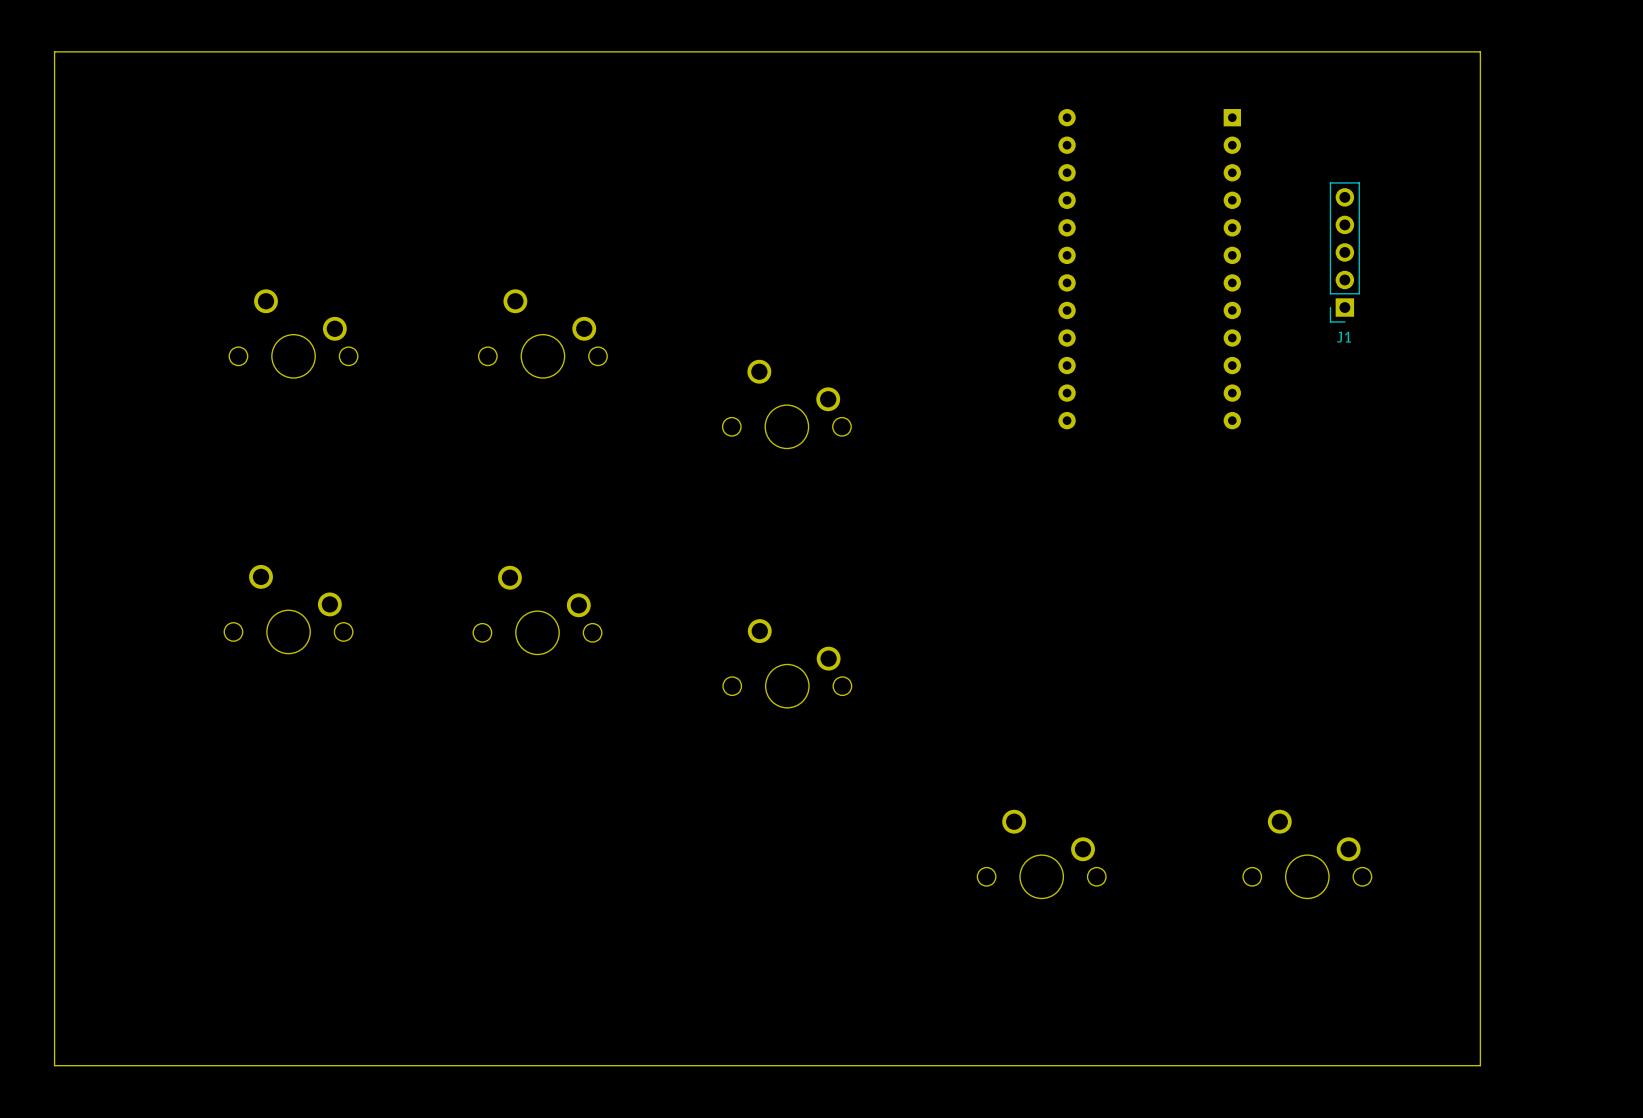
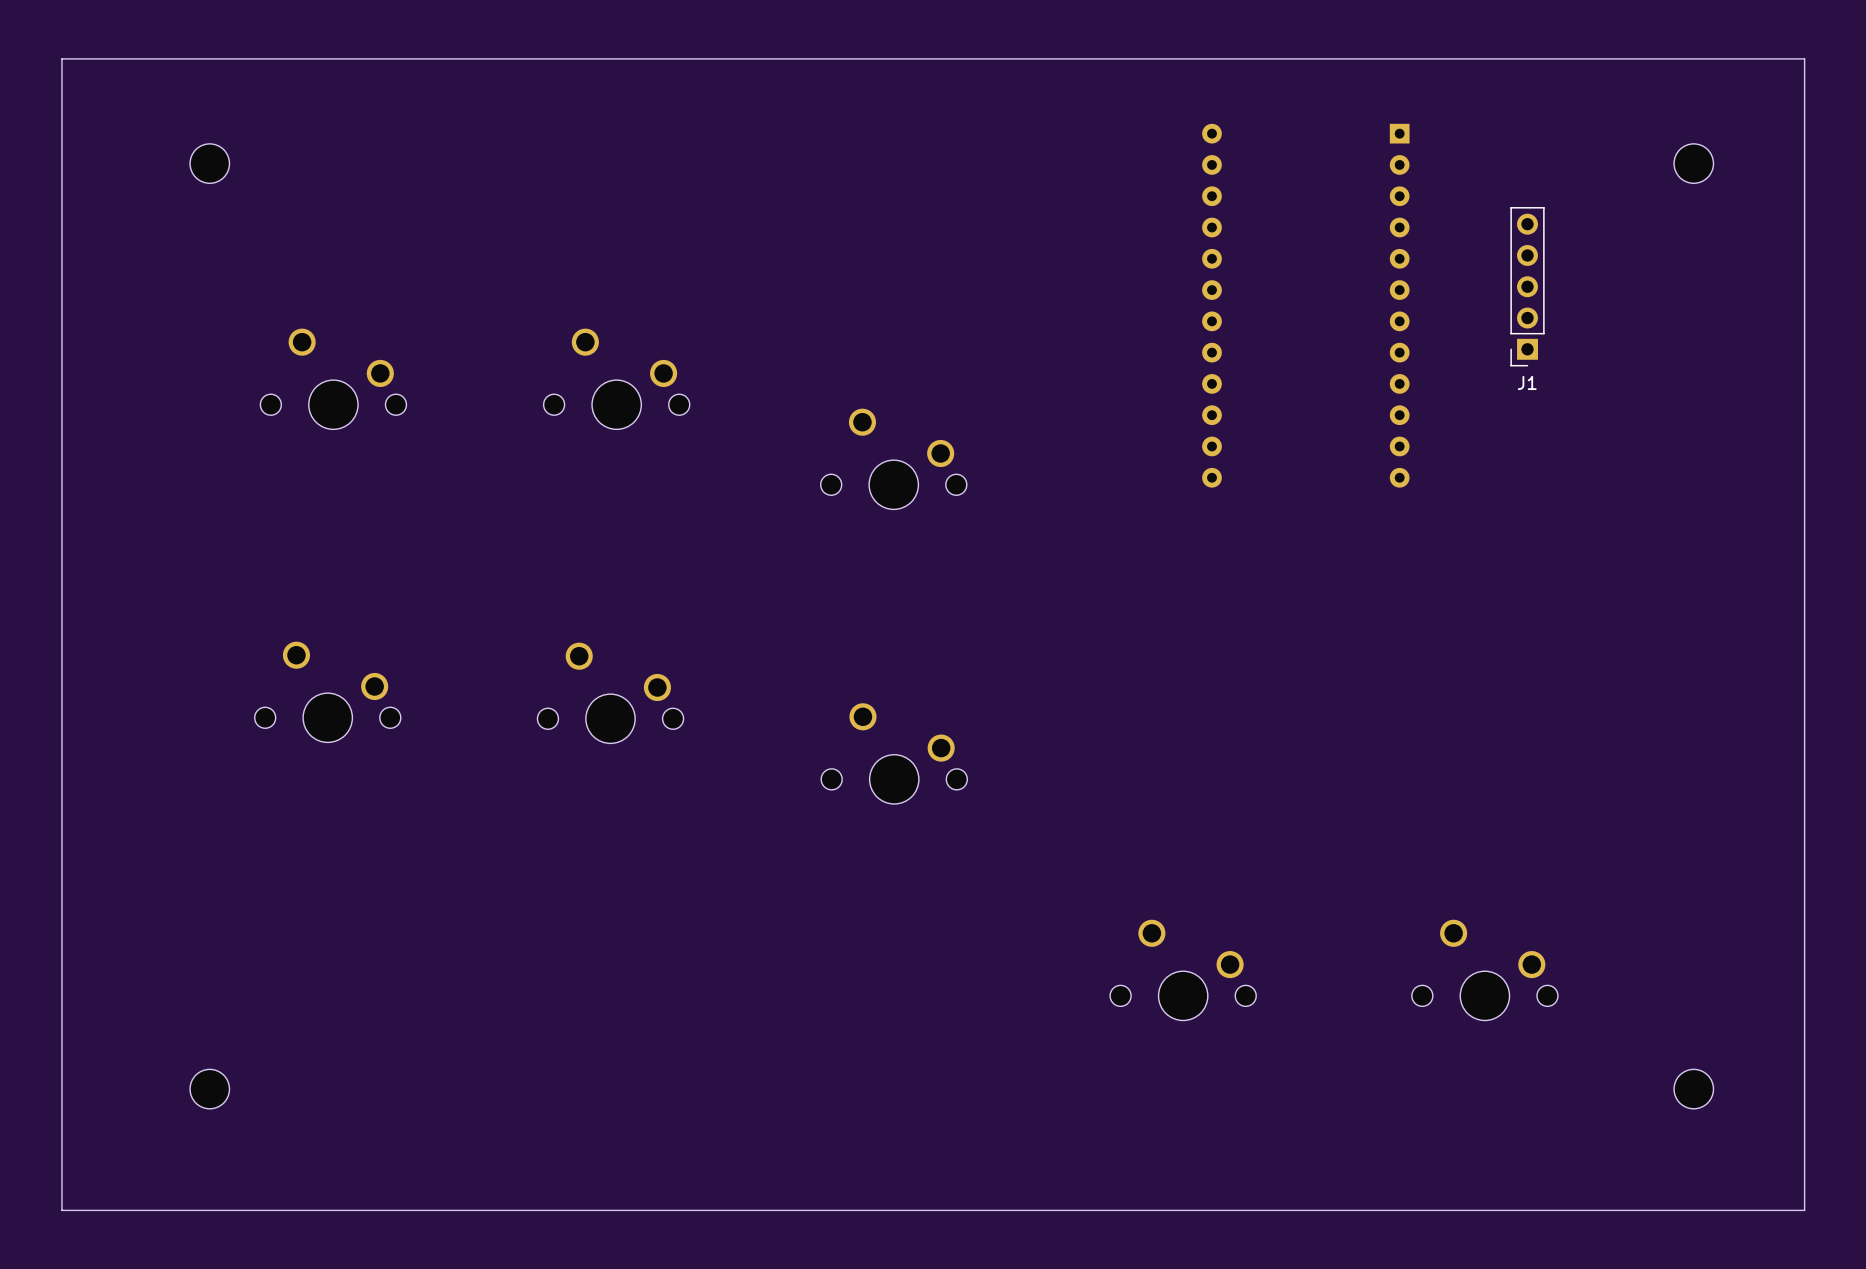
board edge: (1480, 51) (1480, 1065) -> (1681, 58) (1804, 58) (1804, 1210) (1681, 1210)
part: none -> (209, 163)
part: none -> (1693, 163)
part: none -> (209, 1089)
part: none -> (1693, 1089)

